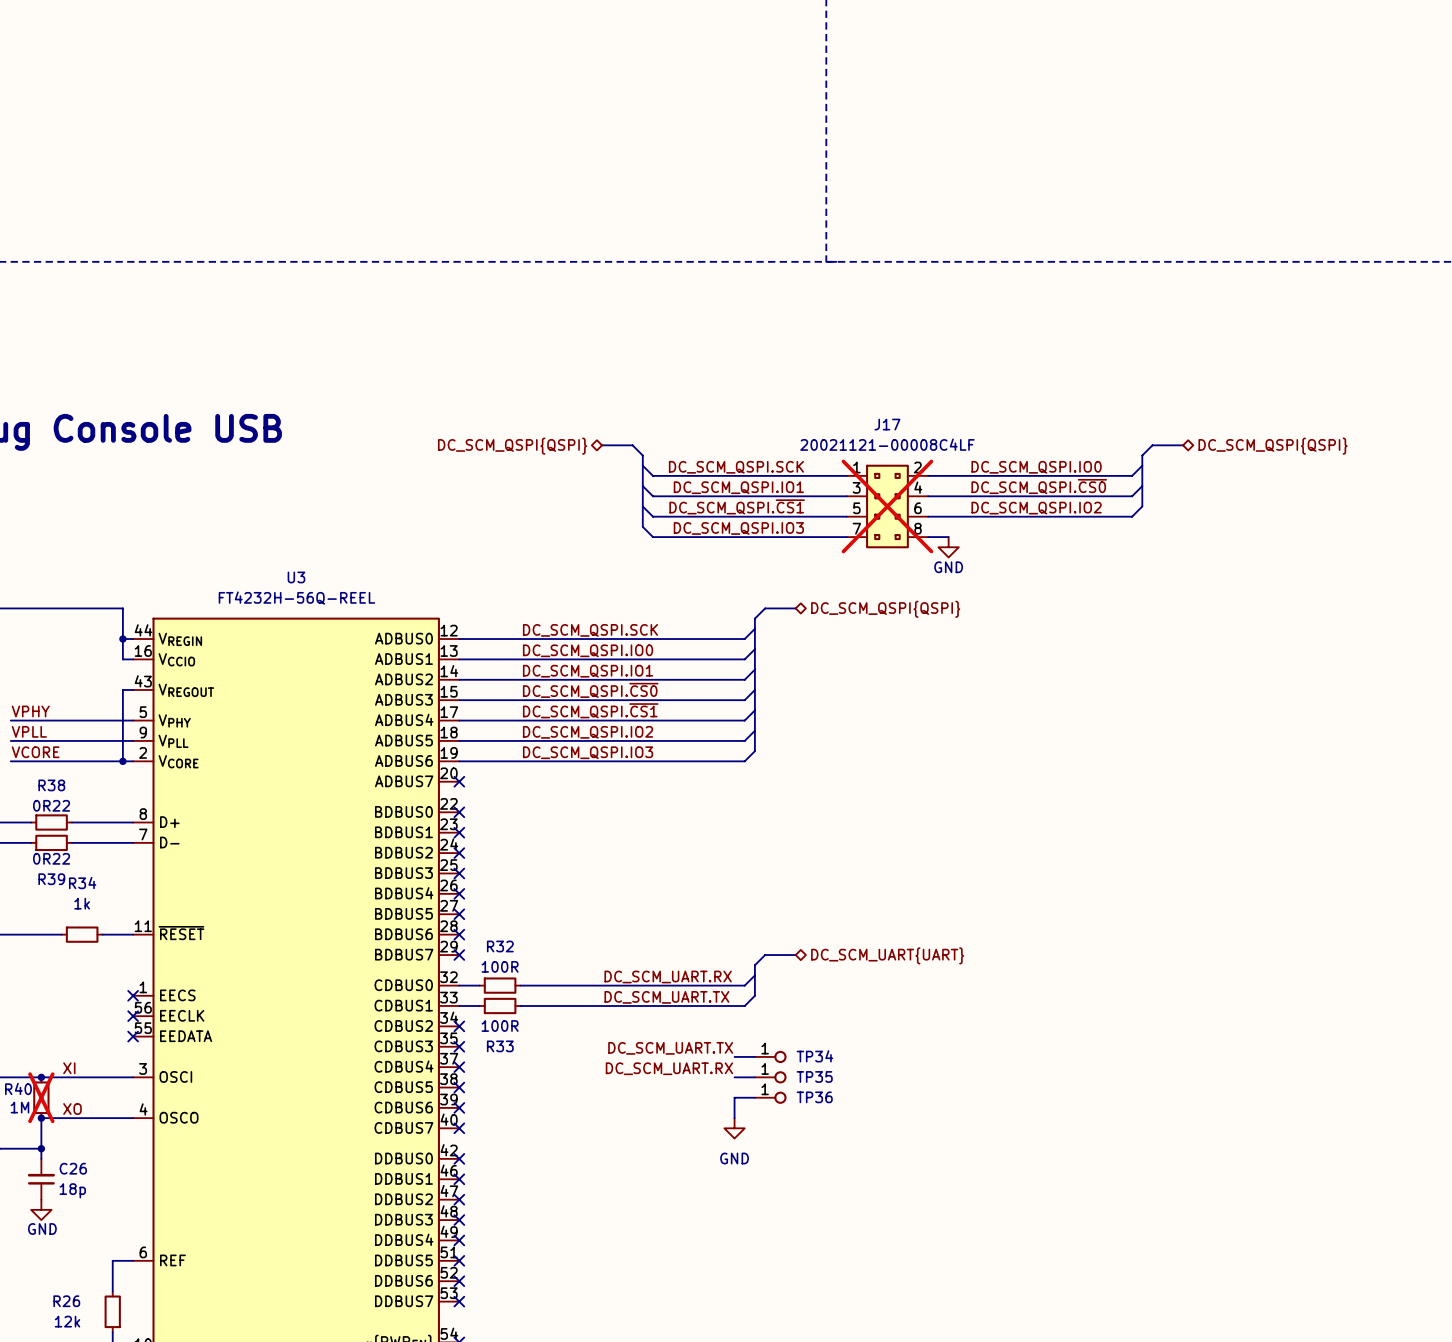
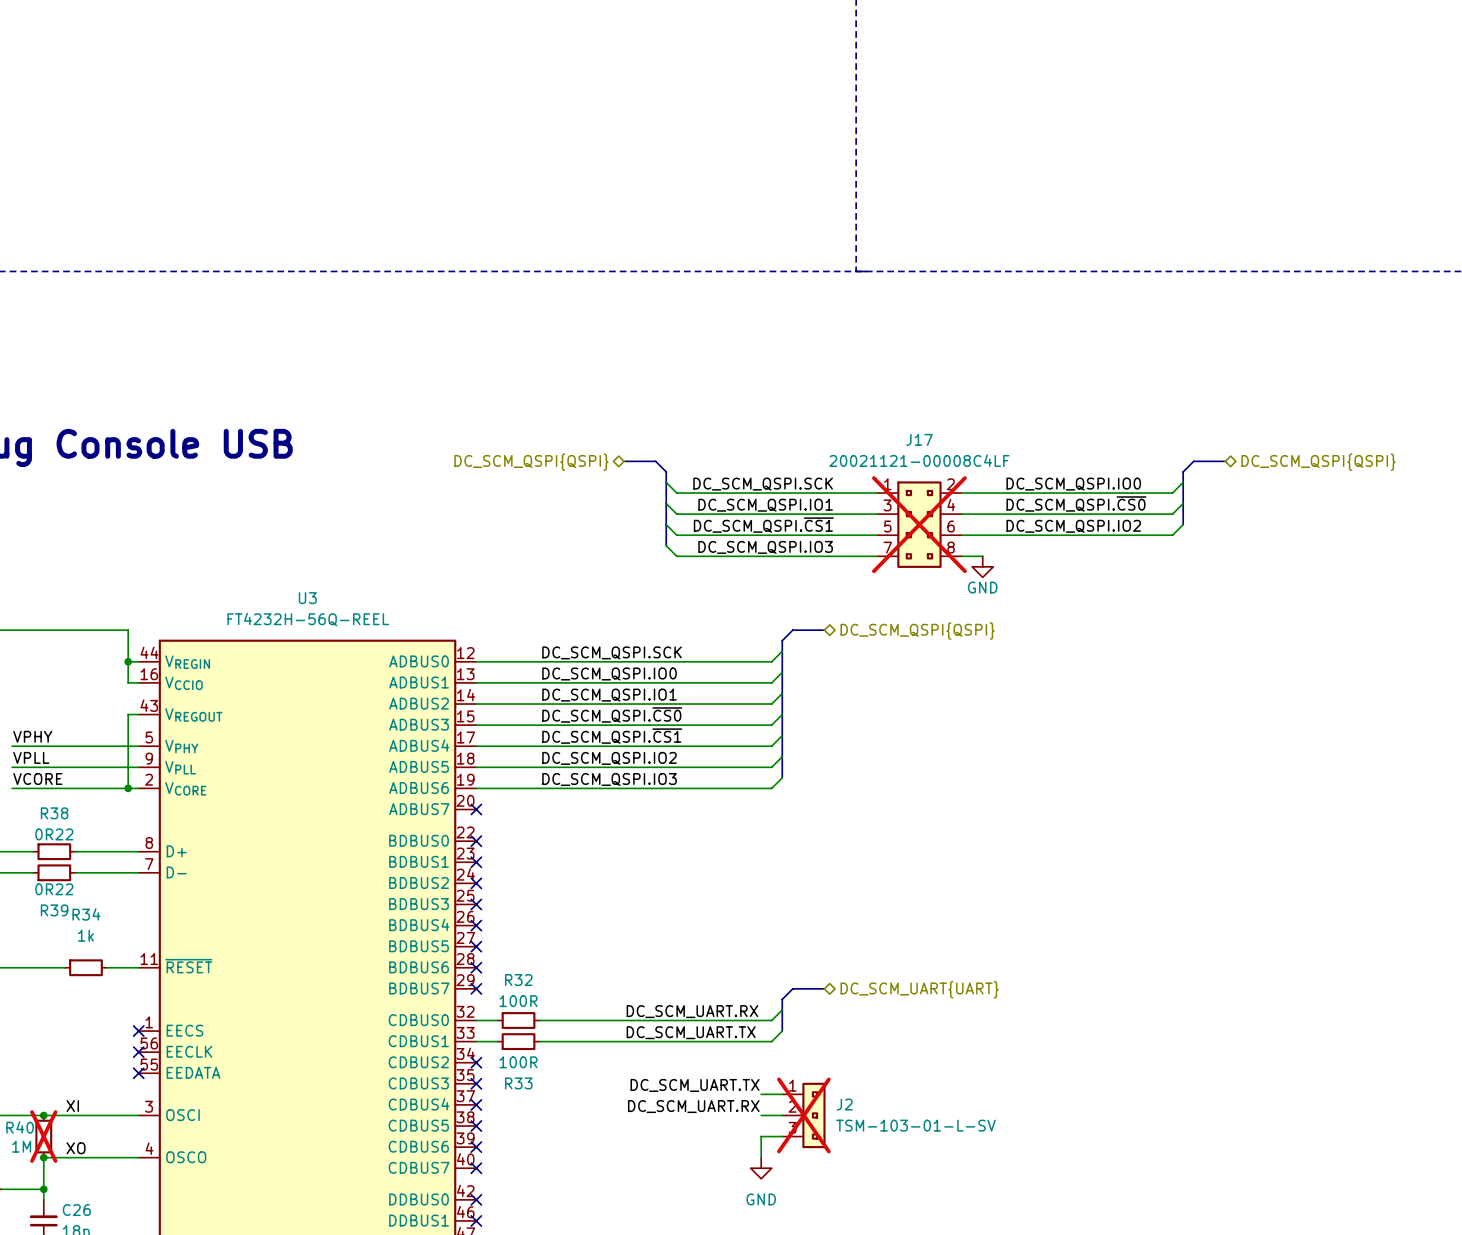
TP34: (770, 1056) -> none
TP35: (770, 1077) -> none
J2: none -> (803, 1115)
TP36: (770, 1097) -> none

